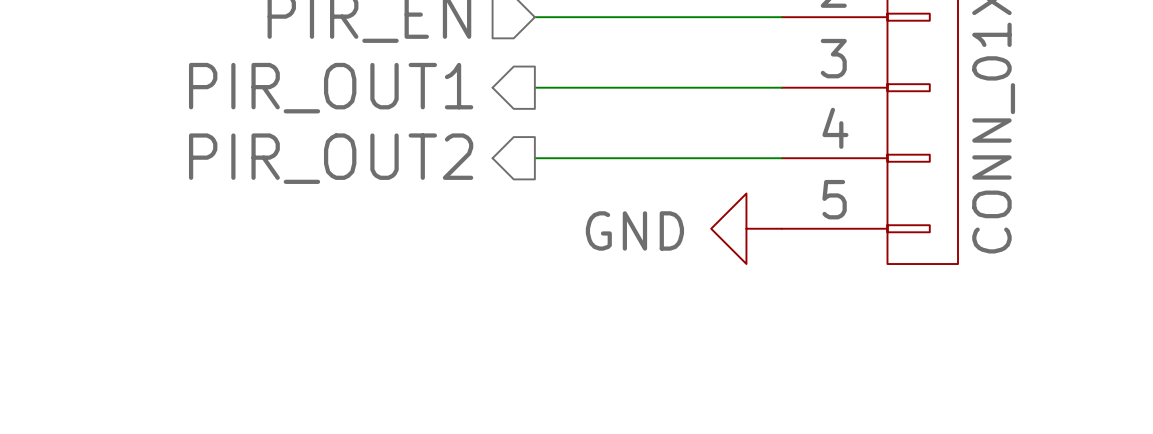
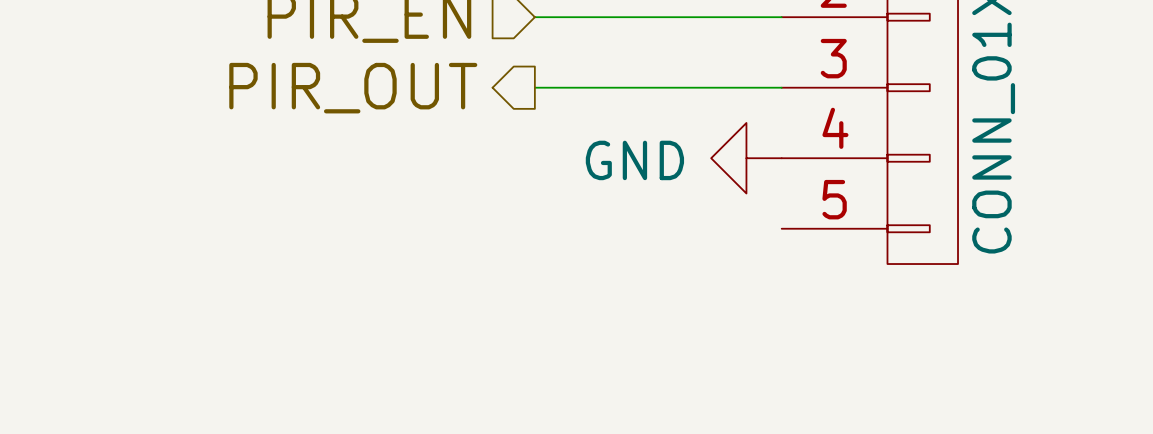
hierarchical label: PIR_OUT1 (331, 88) -> PIR_OUT (353, 88)
hierarchical label: PIR_OUT2 (331, 158) -> none
wire: (534, 158) (781, 158) -> none
power symbol position: GND (746, 228) -> GND (746, 158)

